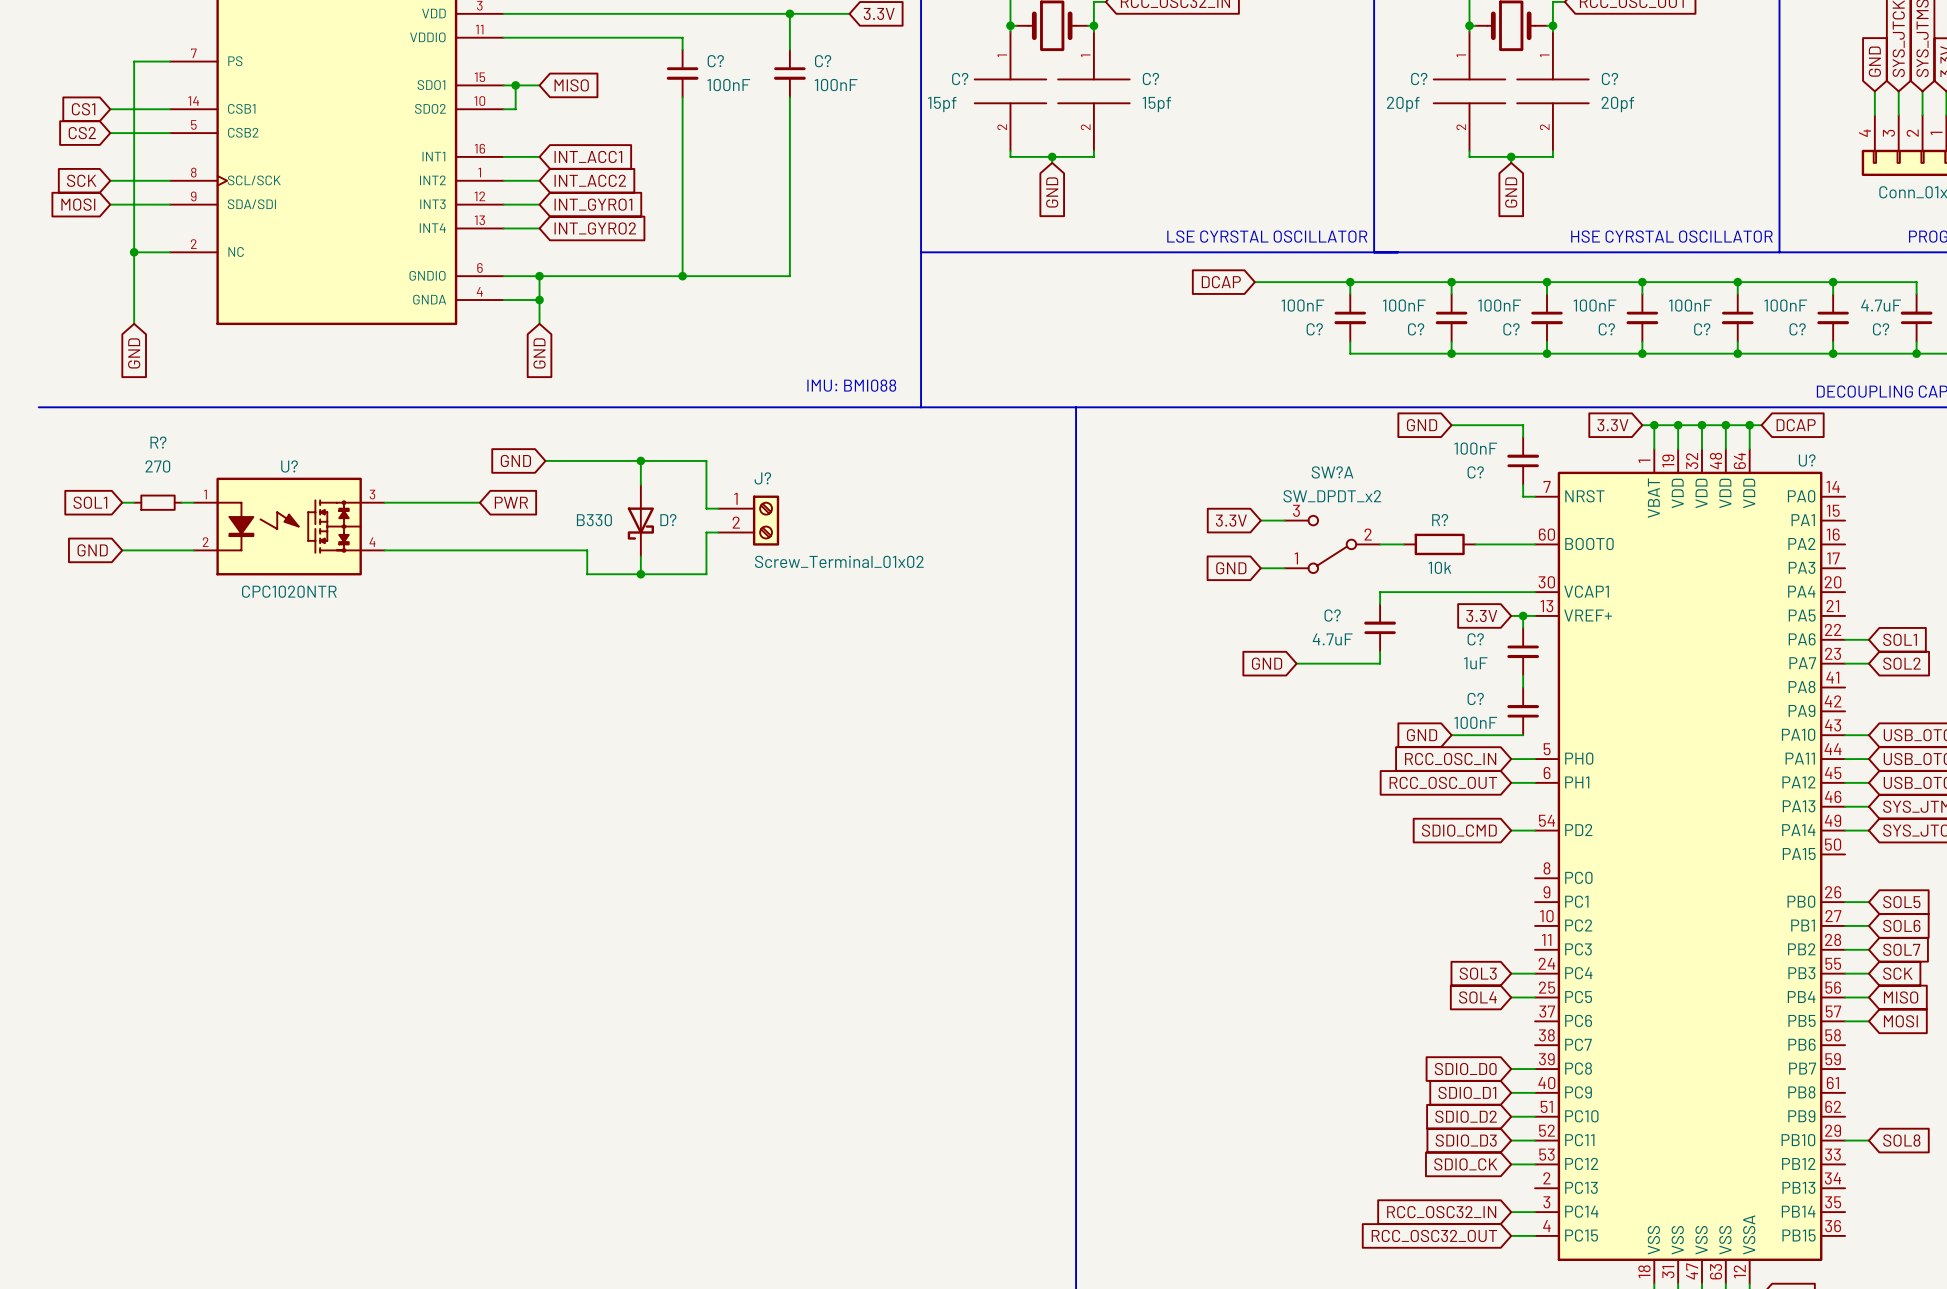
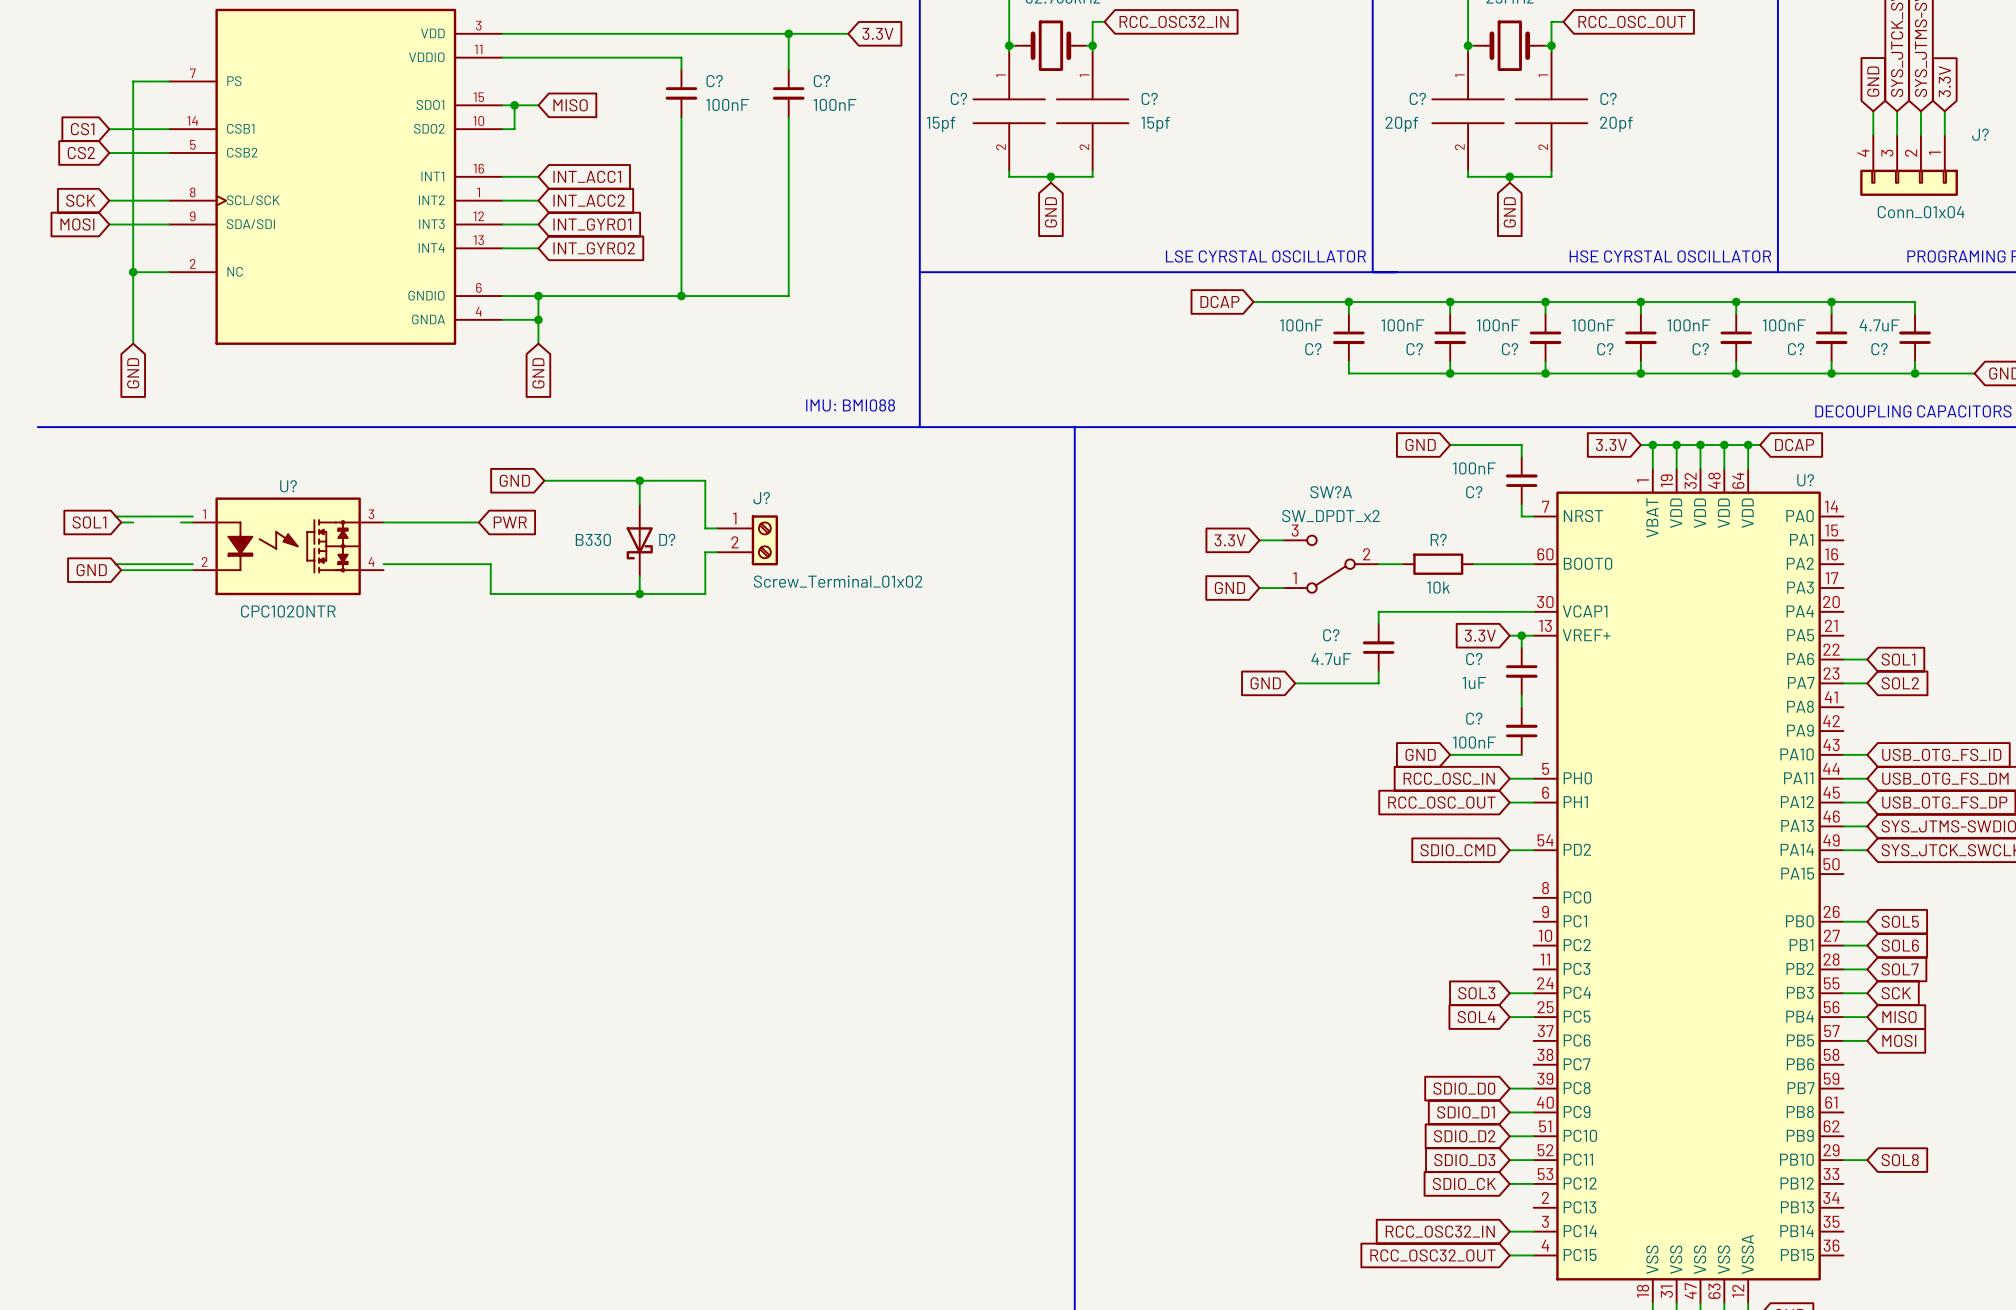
wire: none -> (115, 516) (192, 516)
R?: 270 (157, 502) -> none
wire: none -> (115, 564) (192, 564)
wire: (384, 550) (587, 550) (587, 574) -> (383, 564) (490, 564) (490, 593) (586, 593)

